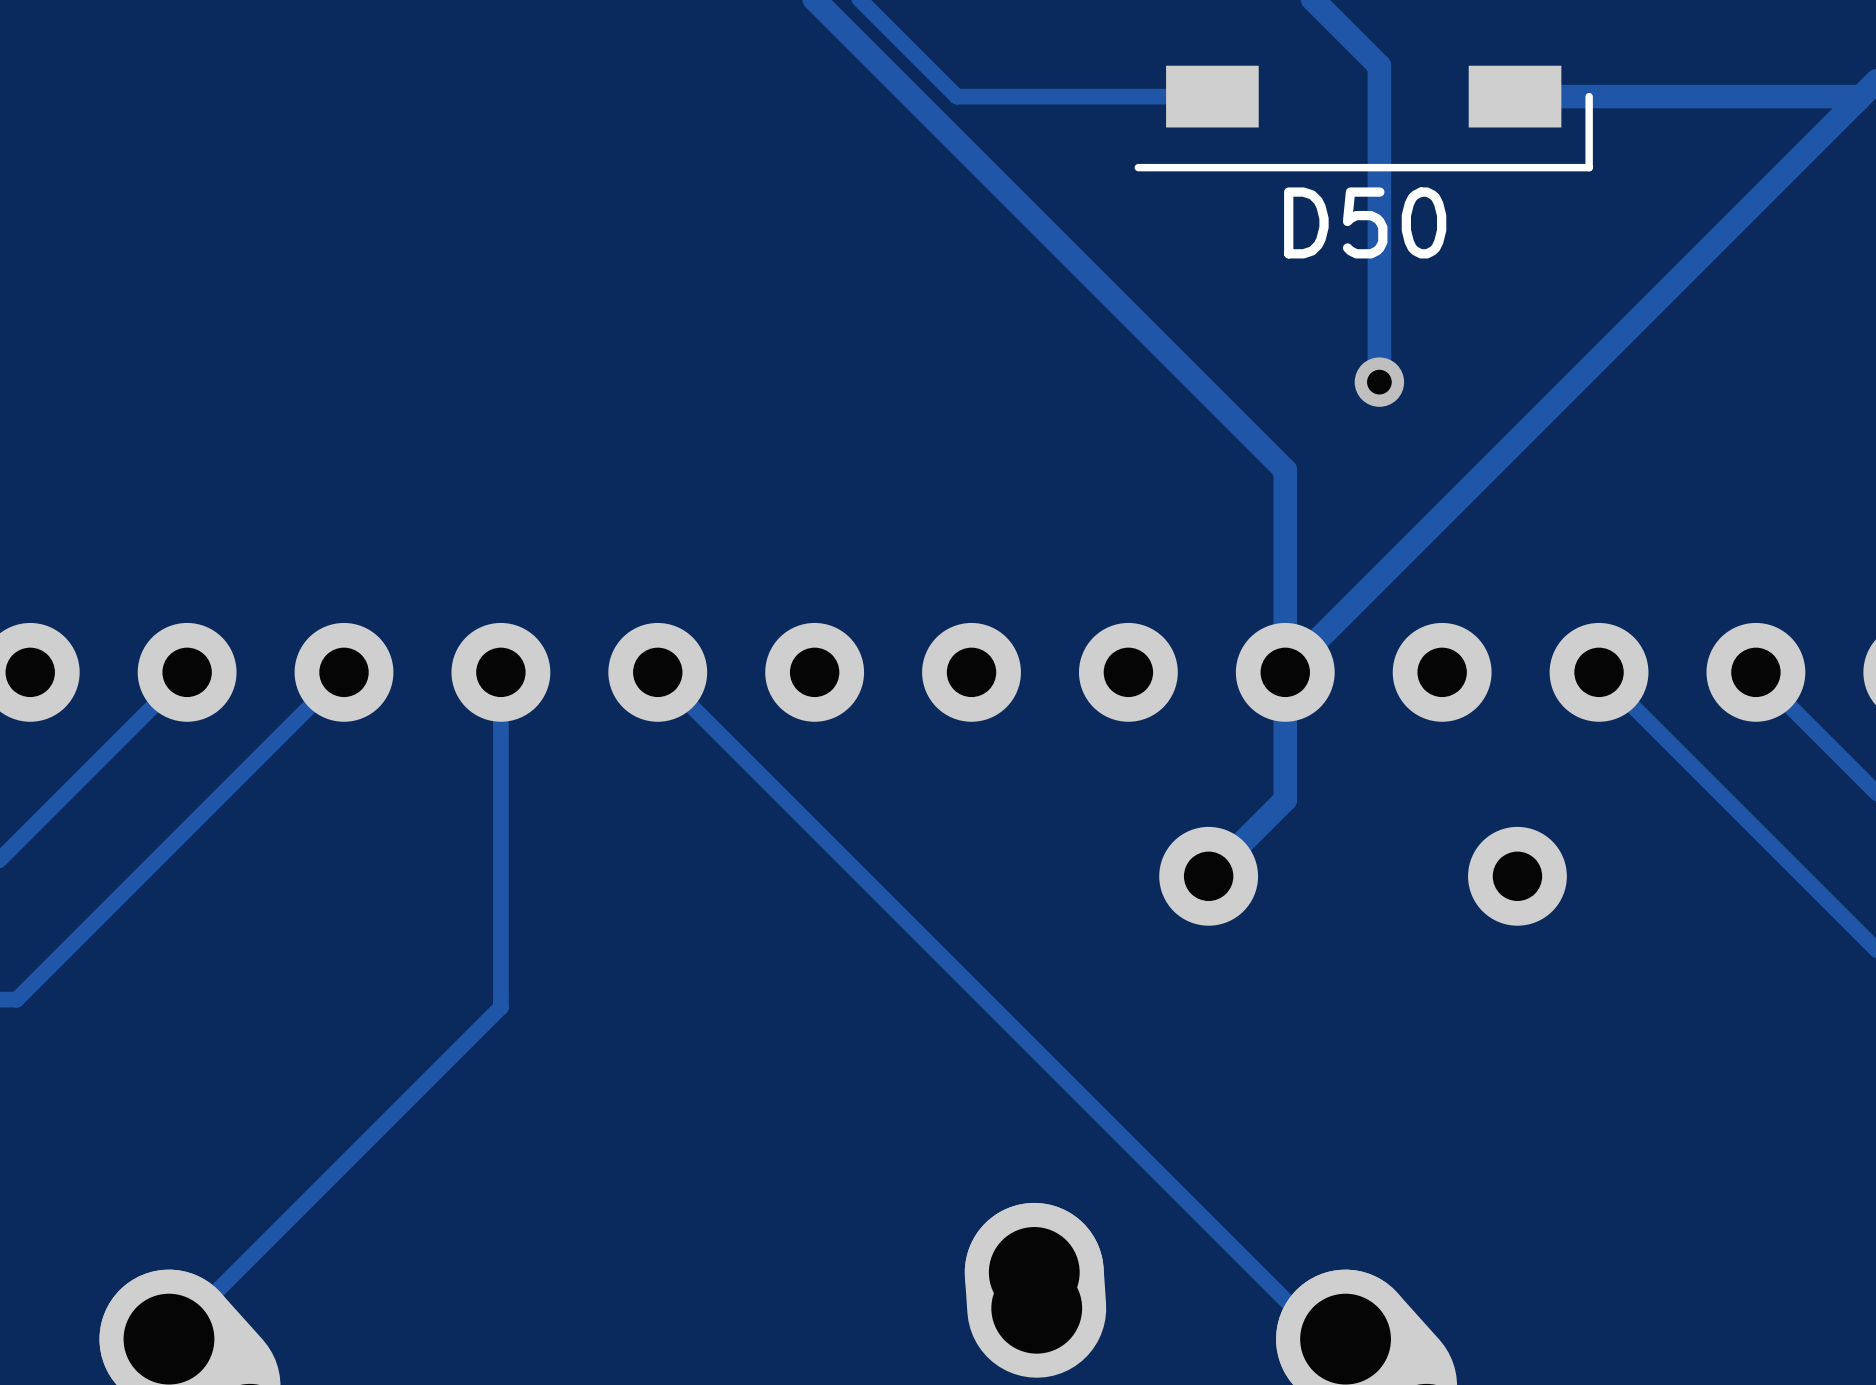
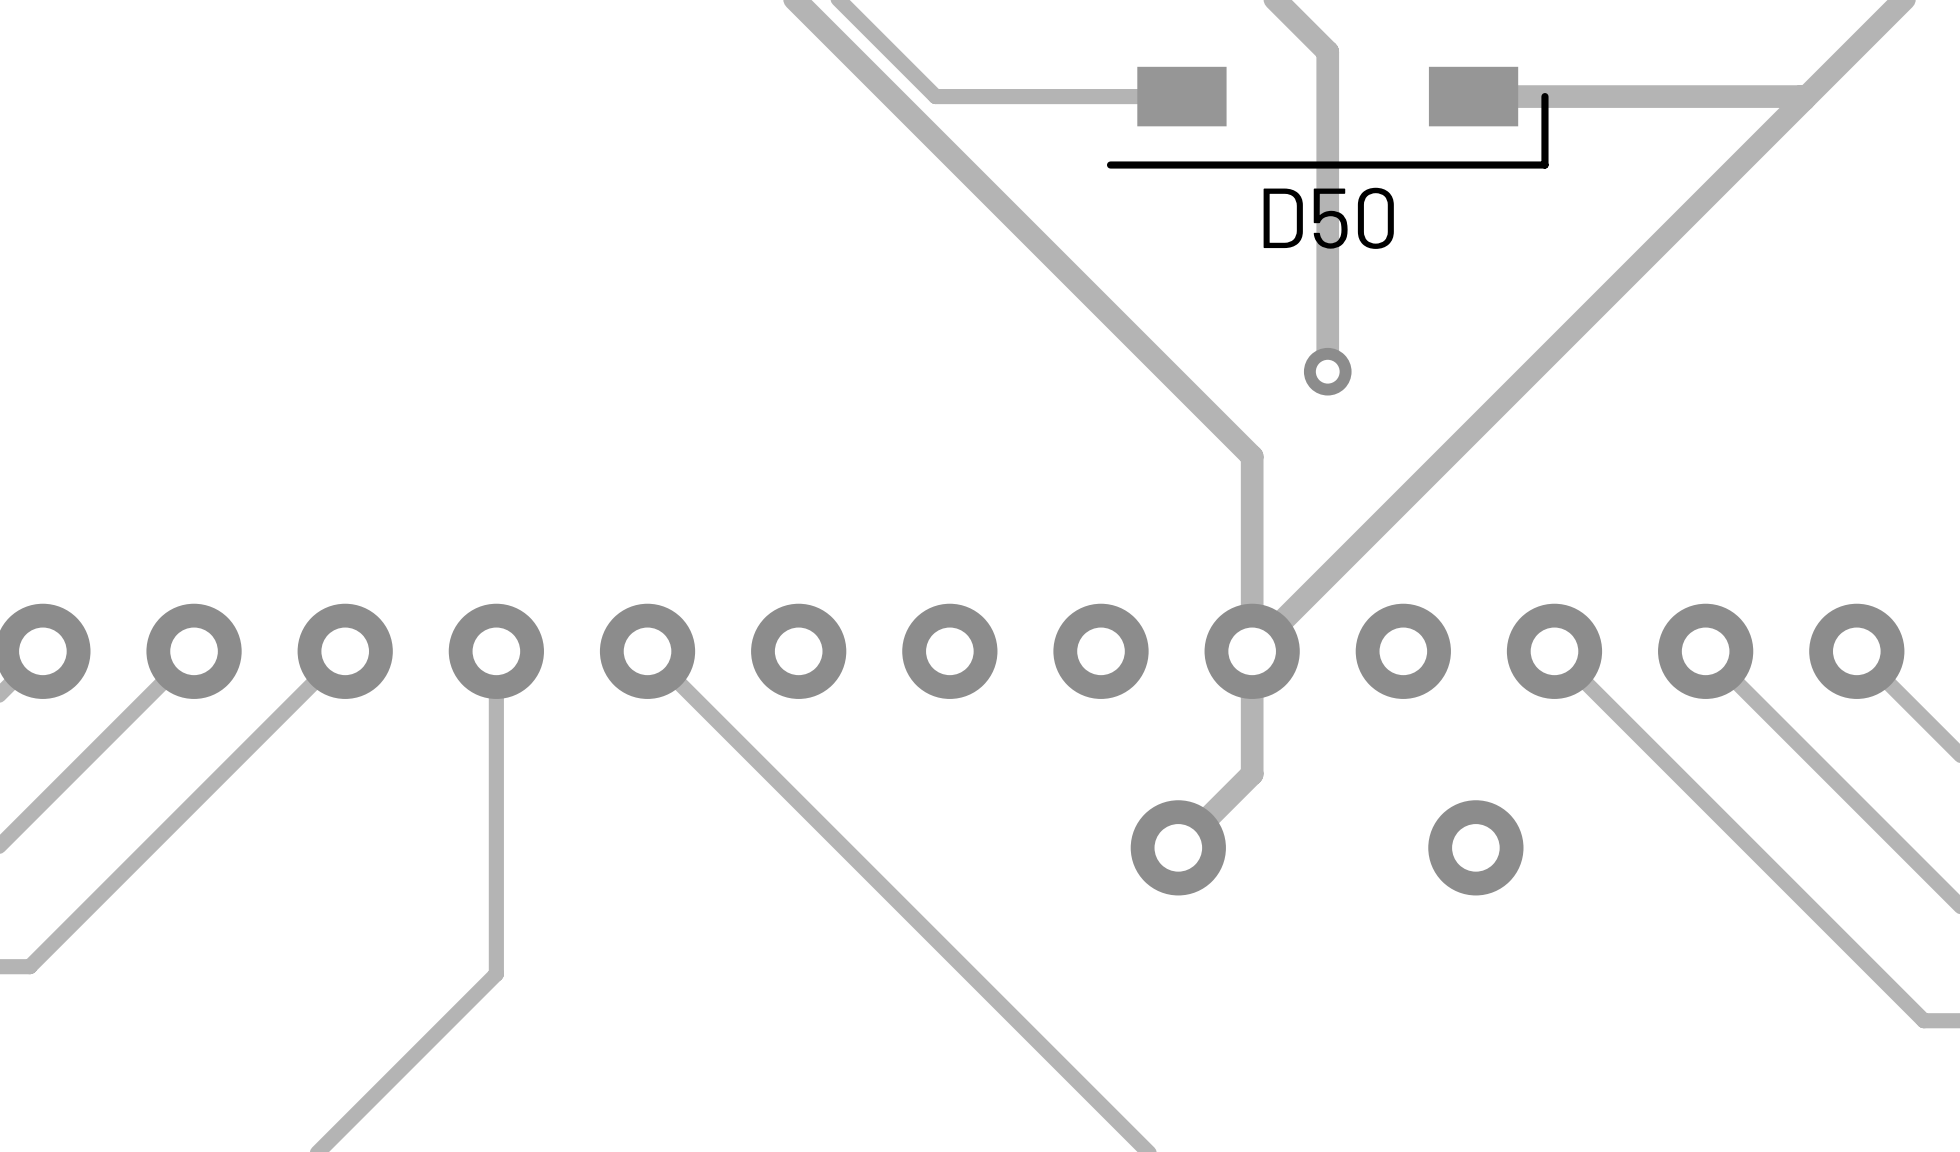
track: (1363, 50) (1379, 65) (1379, 382) -> (1327, 51) (1327, 371)
via position: (1379, 382) -> (1327, 371)

